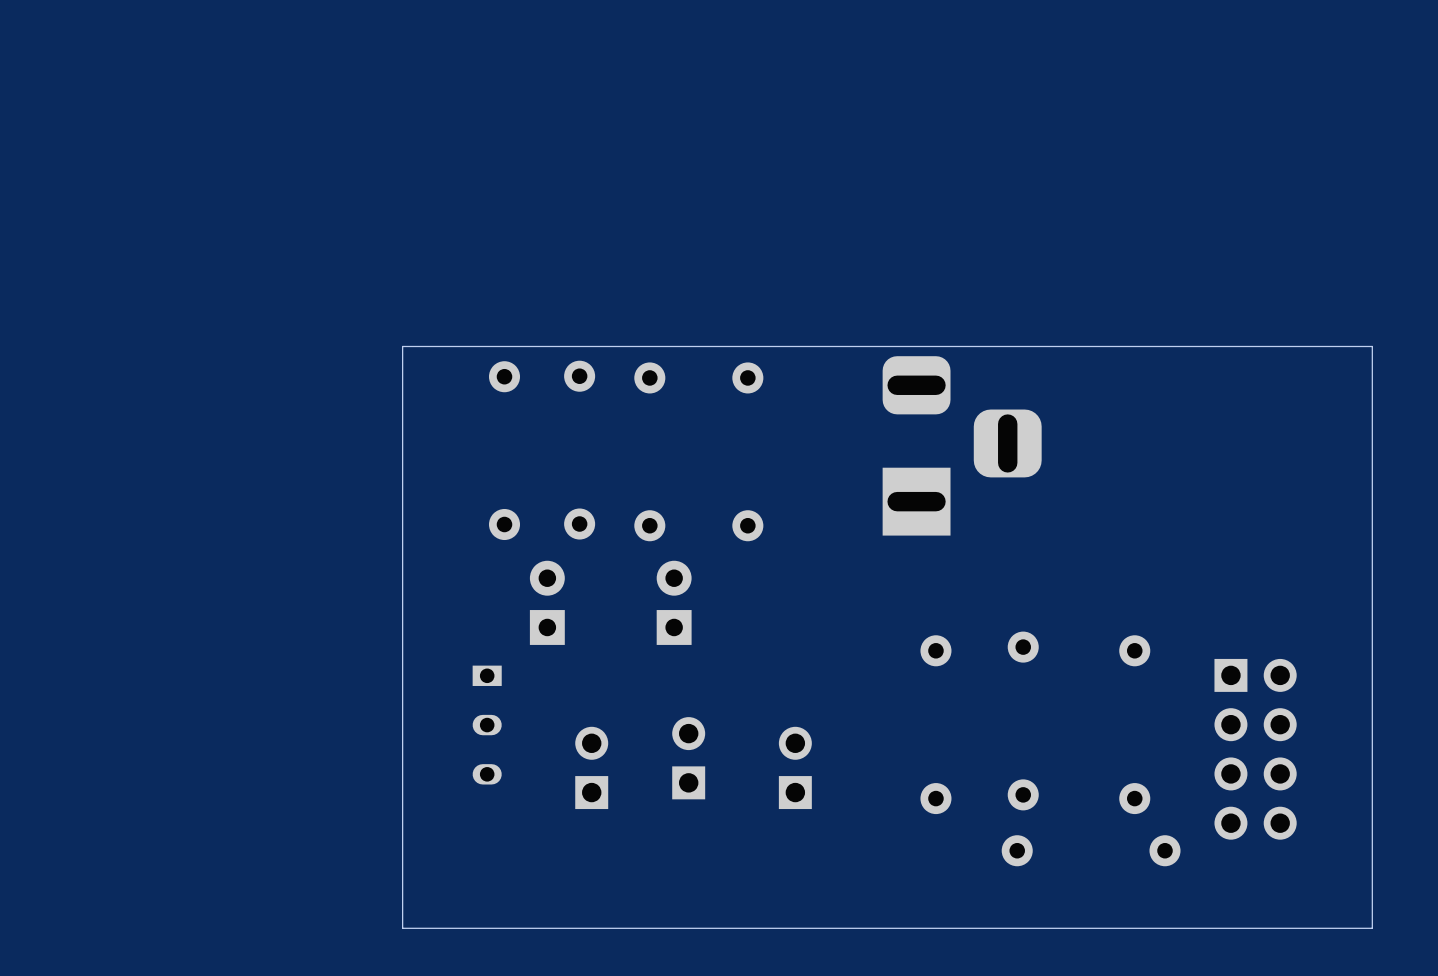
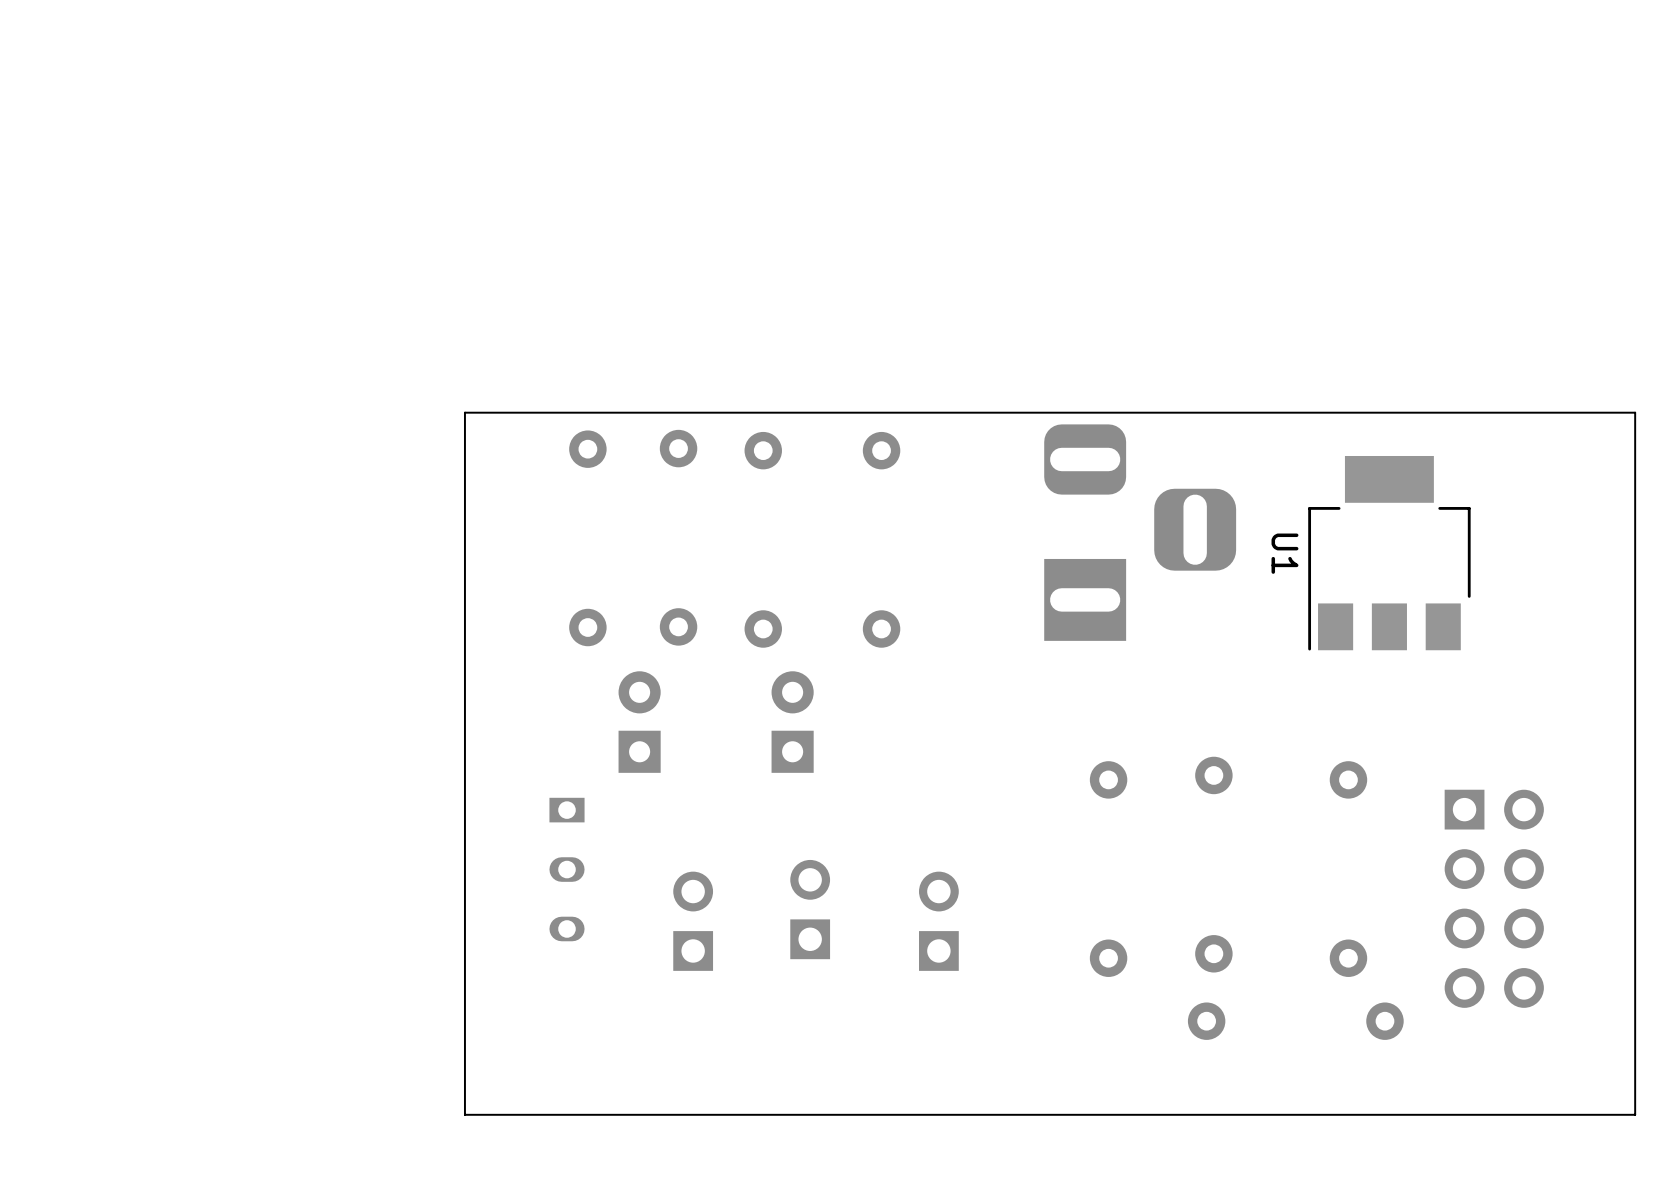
U1: none -> (1389, 553)

